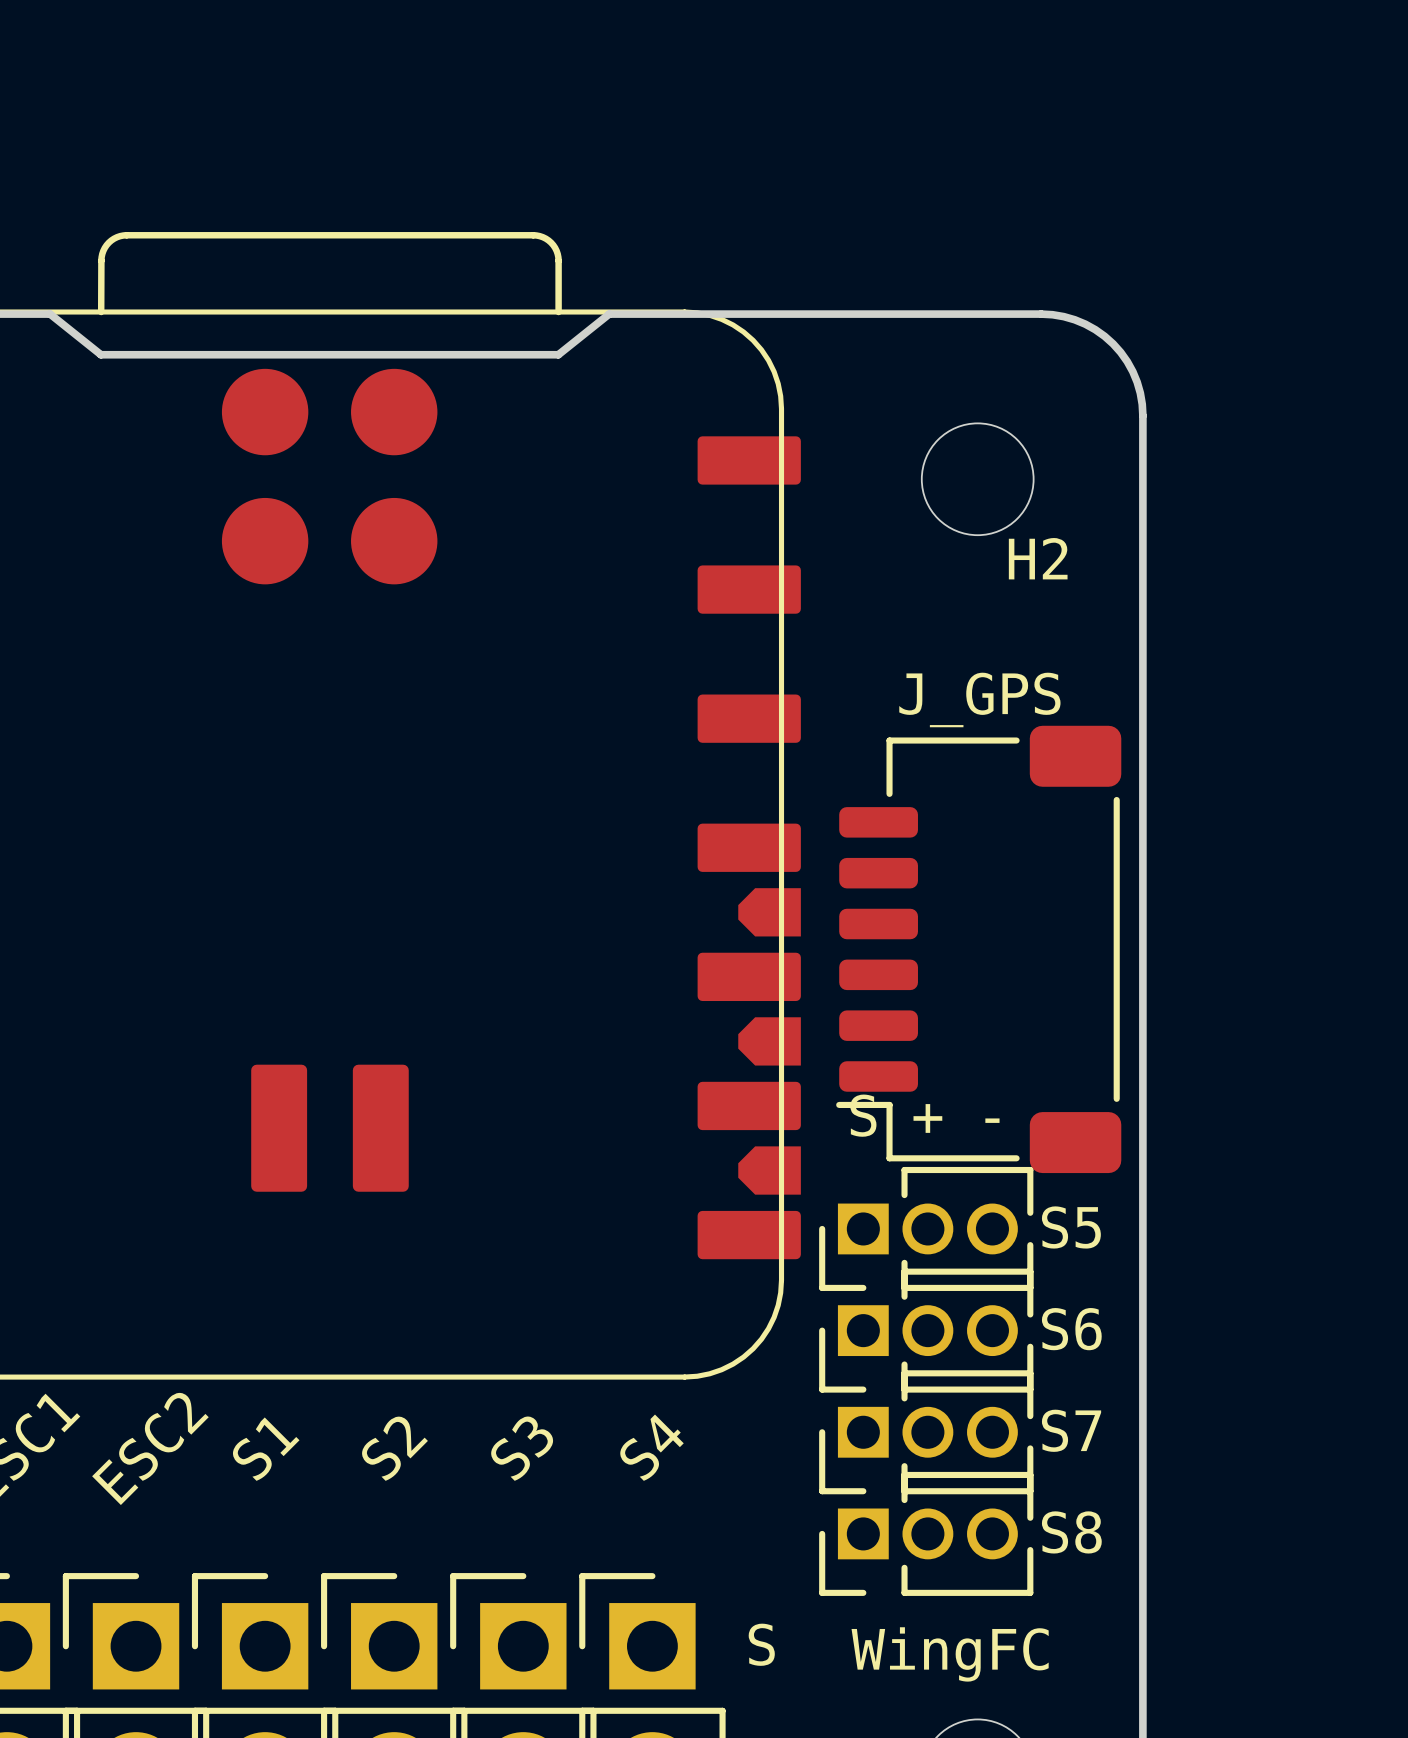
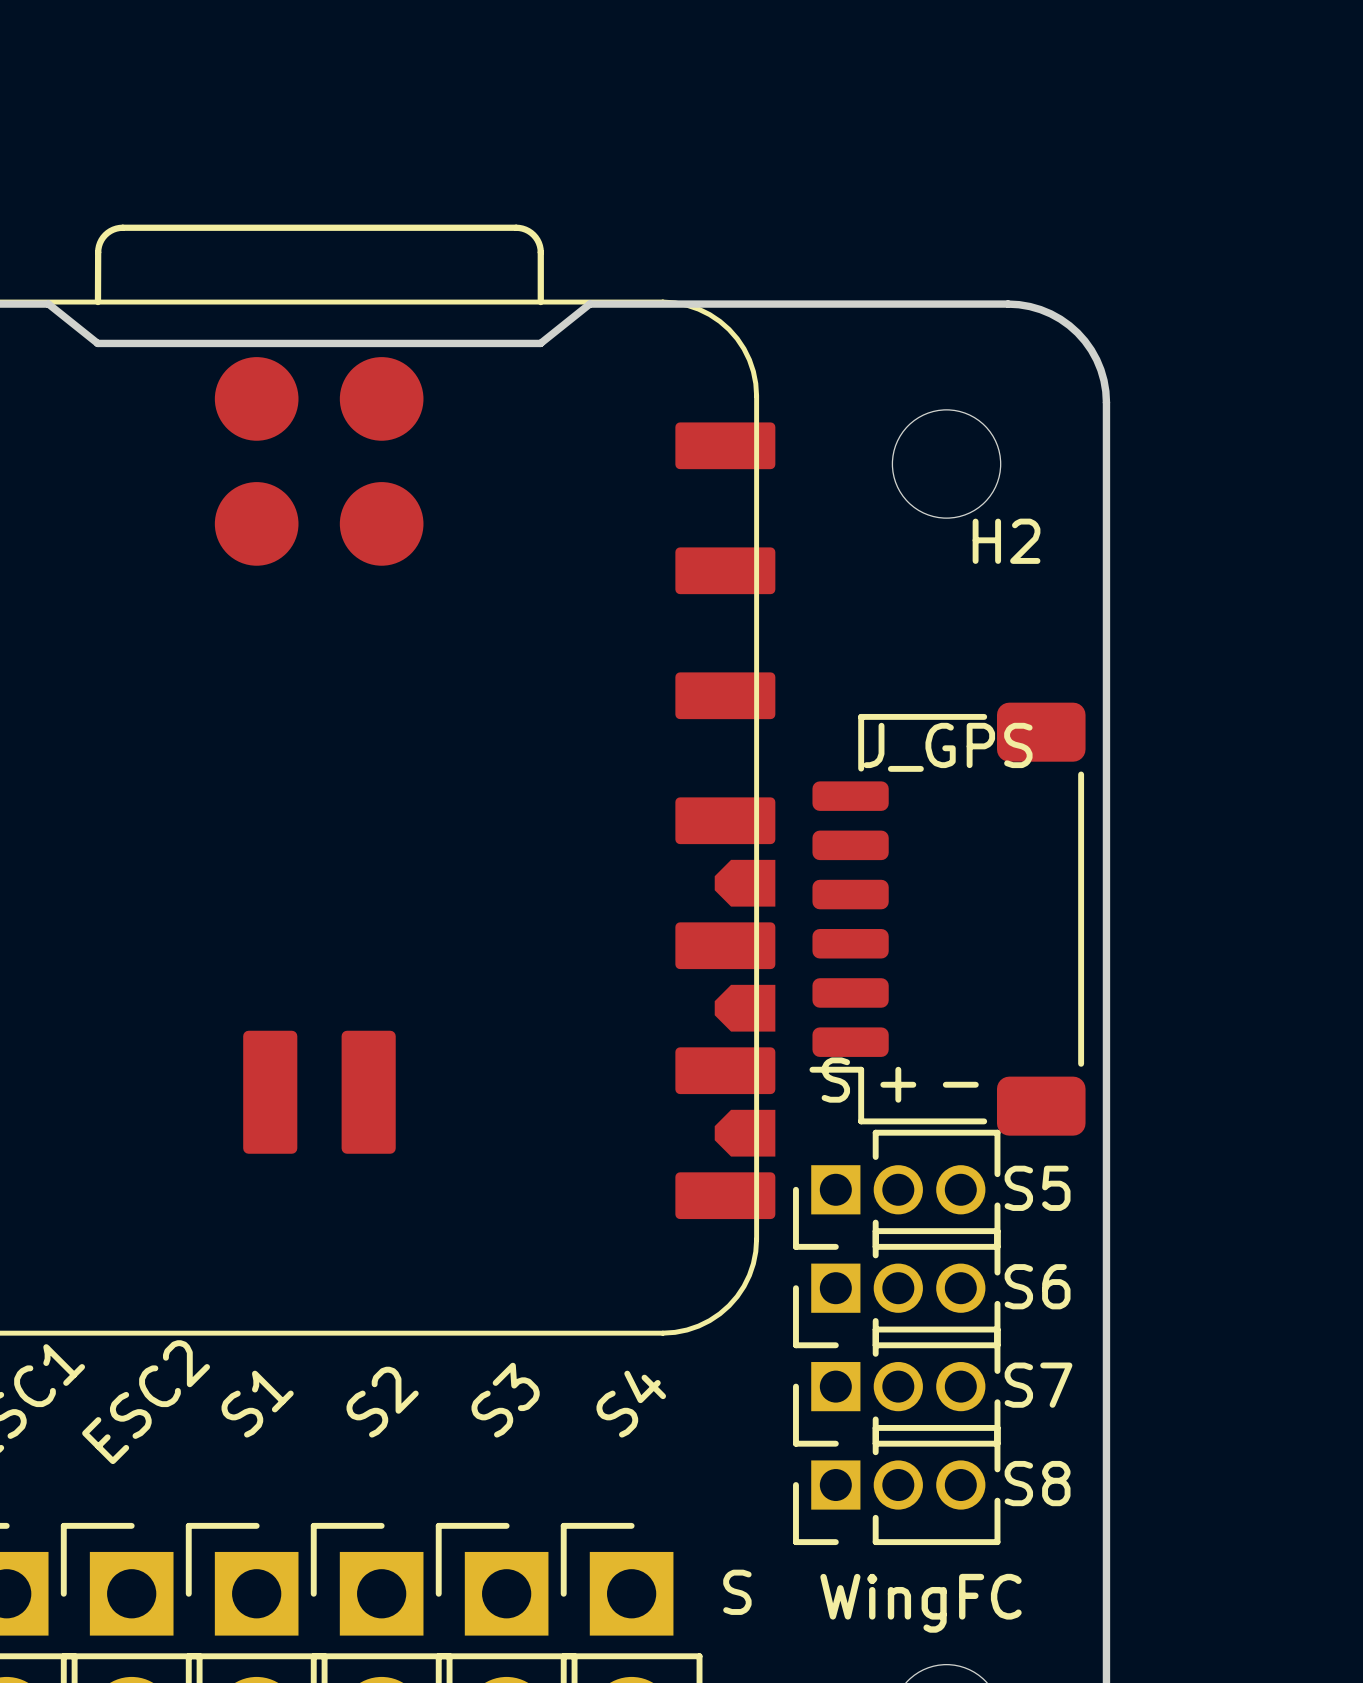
J_GPS name position: J_GPS (979, 699) -> J_GPS (948, 747)

